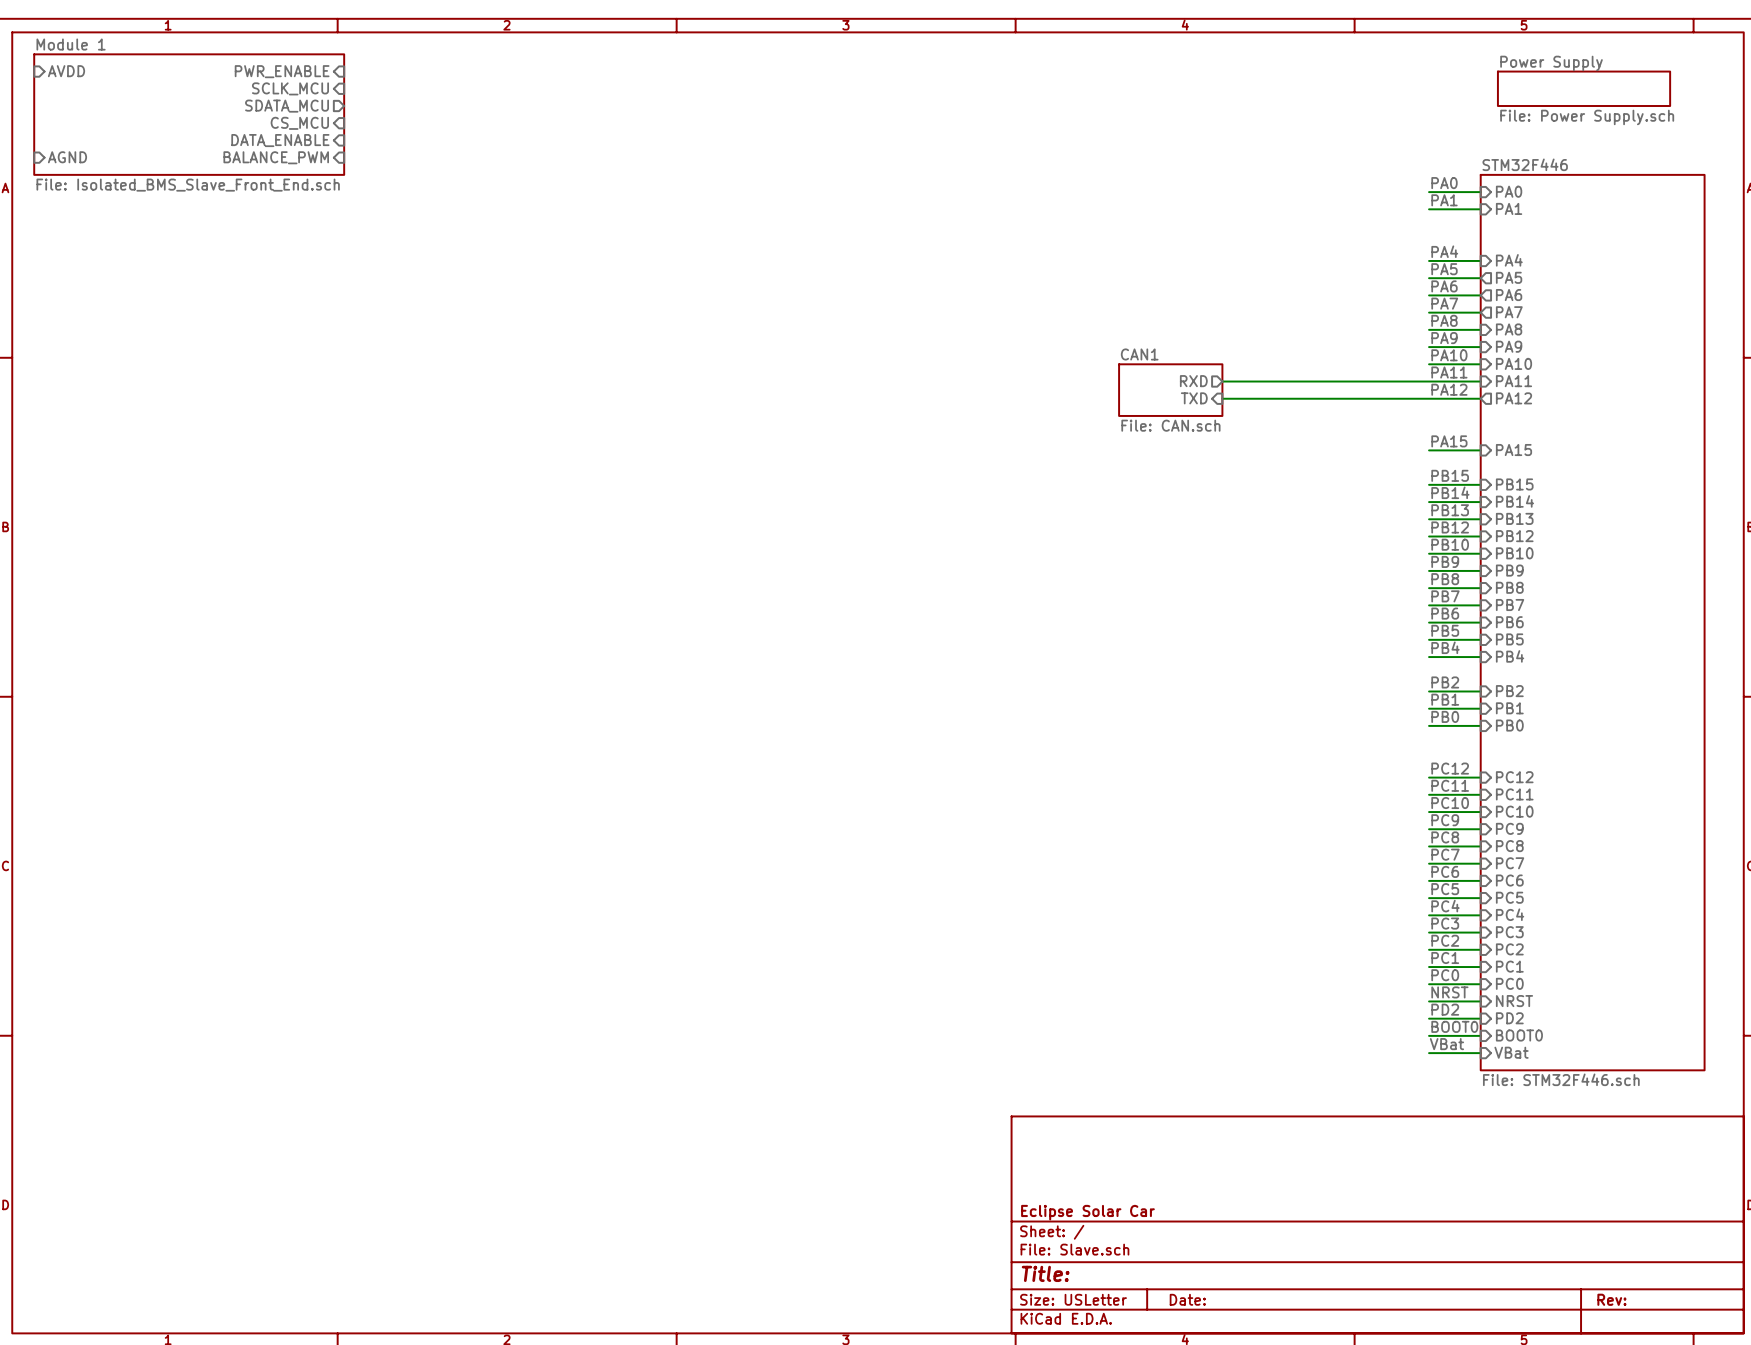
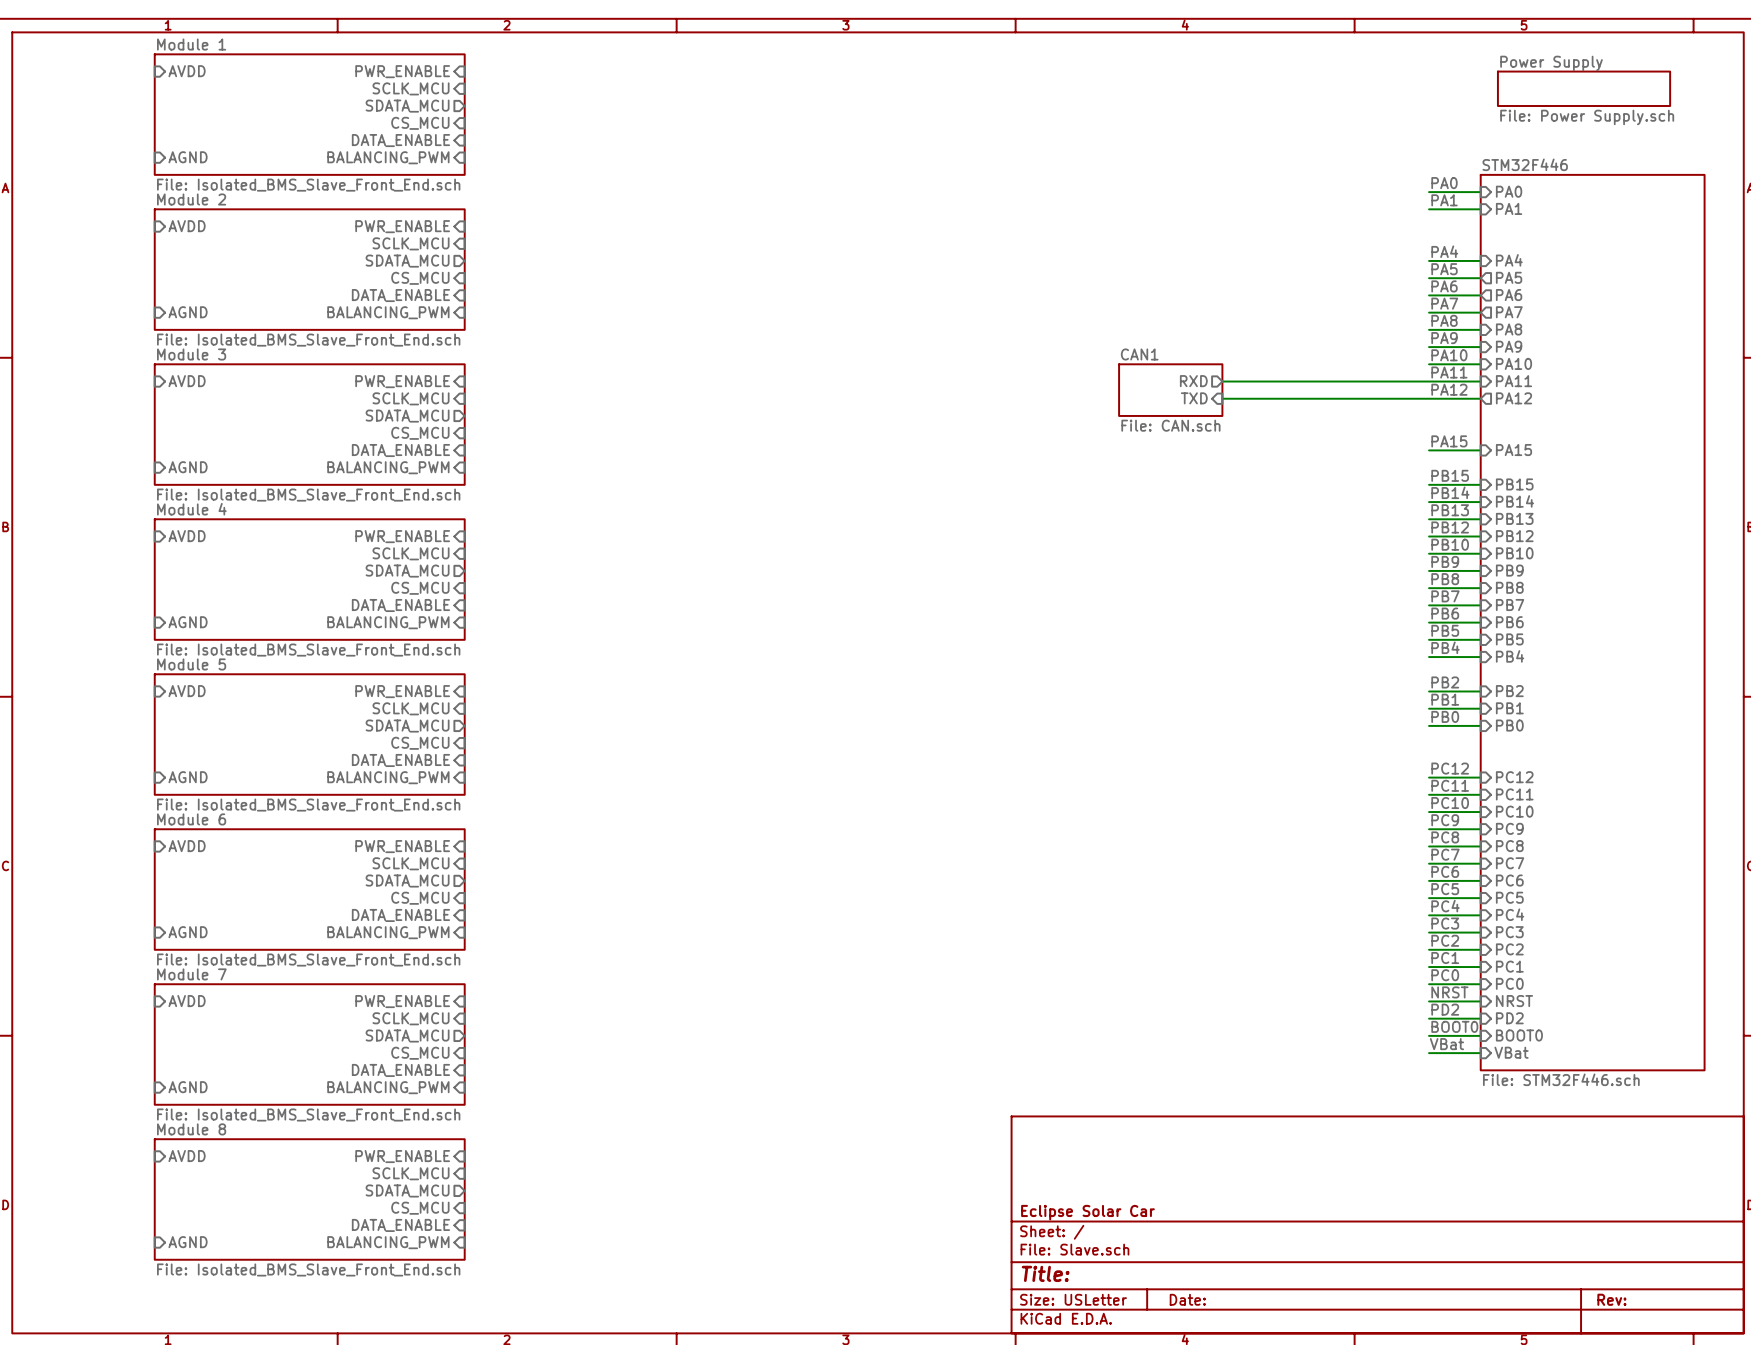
sheet pin: AVDD (66, 71) -> none
sheet pin: none -> AVDD (187, 71)
sheet pin: PWR_ENABLE (282, 71) -> none
sheet pin: none -> PWR_ENABLE (402, 71)
sheet pin: SCLK_MCU (290, 88) -> none
sheet pin: none -> SCLK_MCU (411, 88)
sheet pin: SDATA_MCU (287, 106) -> none
sheet pin: none -> SDATA_MCU (407, 106)
sheet Module 1 position: (189, 114) -> (309, 114)
sheet pin: CS_MCU (299, 123) -> none
sheet pin: none -> CS_MCU (420, 123)
sheet pin: DATA_ENABLE (280, 140) -> none
sheet pin: none -> DATA_ENABLE (400, 140)
sheet pin: AGND (67, 157) -> none
sheet pin: none -> AGND (188, 157)
sheet pin: BALANCE_PWM (276, 157) -> BALANCING_PWM (388, 157)
sheet pin: none -> AVDD (187, 226)
sheet pin: none -> PWR_ENABLE (402, 226)
sheet pin: none -> SCLK_MCU (411, 243)
sheet pin: none -> SDATA_MCU (407, 261)
sheet Module 2: none -> File: Isolated_BMS_Slave_Front_End.sch (309, 269)
sheet pin: none -> CS_MCU (420, 278)
sheet pin: none -> DATA_ENABLE (400, 295)
sheet pin: none -> AGND (188, 312)
sheet pin: none -> BALANCING_PWM (388, 312)
sheet pin: none -> AVDD (187, 381)
sheet pin: none -> PWR_ENABLE (402, 381)
sheet pin: none -> SCLK_MCU (411, 398)
sheet pin: none -> SDATA_MCU (407, 416)
sheet Module 3: none -> File: Isolated_BMS_Slave_Front_End.sch (309, 424)
sheet pin: none -> CS_MCU (420, 433)
sheet pin: none -> DATA_ENABLE (400, 450)
sheet pin: none -> AGND (188, 467)
sheet pin: none -> BALANCING_PWM (388, 467)
sheet pin: none -> AVDD (187, 536)
sheet pin: none -> PWR_ENABLE (402, 536)
sheet pin: none -> SCLK_MCU (411, 553)
sheet pin: none -> SDATA_MCU (407, 571)
sheet Module 4: none -> File: Isolated_BMS_Slave_Front_End.sch (309, 579)
sheet pin: none -> CS_MCU (420, 588)
sheet pin: none -> DATA_ENABLE (400, 605)
sheet pin: none -> AGND (188, 622)
sheet pin: none -> BALANCING_PWM (388, 622)
sheet pin: none -> AVDD (187, 691)
sheet pin: none -> PWR_ENABLE (402, 691)
sheet pin: none -> SCLK_MCU (411, 708)
sheet pin: none -> SDATA_MCU (407, 726)
sheet Module 5: none -> File: Isolated_BMS_Slave_Front_End.sch (309, 734)
sheet pin: none -> CS_MCU (420, 743)
sheet pin: none -> DATA_ENABLE (400, 760)
sheet pin: none -> AGND (188, 777)
sheet pin: none -> BALANCING_PWM (388, 777)
sheet pin: none -> AVDD (187, 846)
sheet pin: none -> PWR_ENABLE (402, 846)
sheet pin: none -> SCLK_MCU (411, 863)
sheet pin: none -> SDATA_MCU (407, 881)
sheet Module 6: none -> File: Isolated_BMS_Slave_Front_End.sch (309, 889)
sheet pin: none -> CS_MCU (420, 898)
sheet pin: none -> DATA_ENABLE (400, 915)
sheet pin: none -> AGND (188, 932)
sheet pin: none -> BALANCING_PWM (388, 932)
sheet pin: none -> AVDD (187, 1001)
sheet pin: none -> PWR_ENABLE (402, 1001)
sheet pin: none -> SCLK_MCU (411, 1018)
sheet pin: none -> SDATA_MCU (407, 1036)
sheet Module 7: none -> File: Isolated_BMS_Slave_Front_End.sch (309, 1044)
sheet pin: none -> CS_MCU (420, 1053)
sheet pin: none -> DATA_ENABLE (400, 1070)
sheet pin: none -> AGND (188, 1087)
sheet pin: none -> BALANCING_PWM (388, 1087)
sheet pin: none -> AVDD (187, 1156)
sheet pin: none -> PWR_ENABLE (402, 1156)
sheet pin: none -> SCLK_MCU (411, 1173)
sheet pin: none -> SDATA_MCU (407, 1190)
sheet Module 8: none -> File: Isolated_BMS_Slave_Front_End.sch (309, 1199)
sheet pin: none -> CS_MCU (420, 1208)
sheet pin: none -> DATA_ENABLE (400, 1225)
sheet pin: none -> AGND (188, 1242)
sheet pin: none -> BALANCING_PWM (388, 1242)

